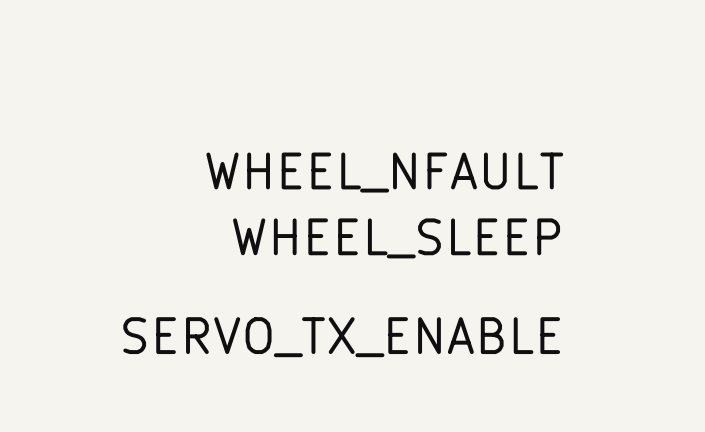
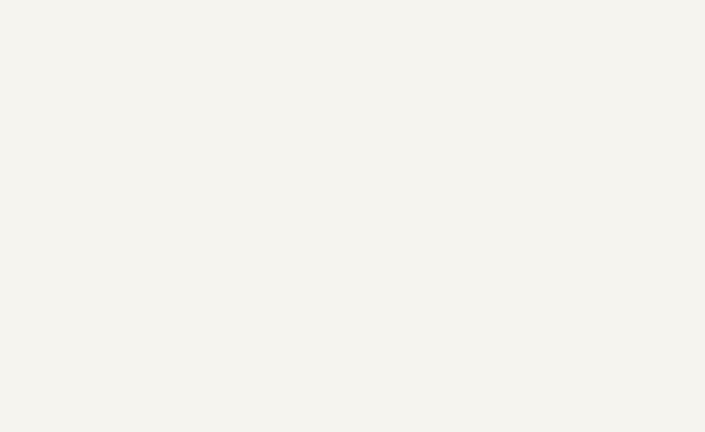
label: WHEEL_NFAULT (384, 172) -> none
label: WHEEL_SLEEP (396, 238) -> none
label: SERVO_TX_ENABLE (341, 337) -> none

